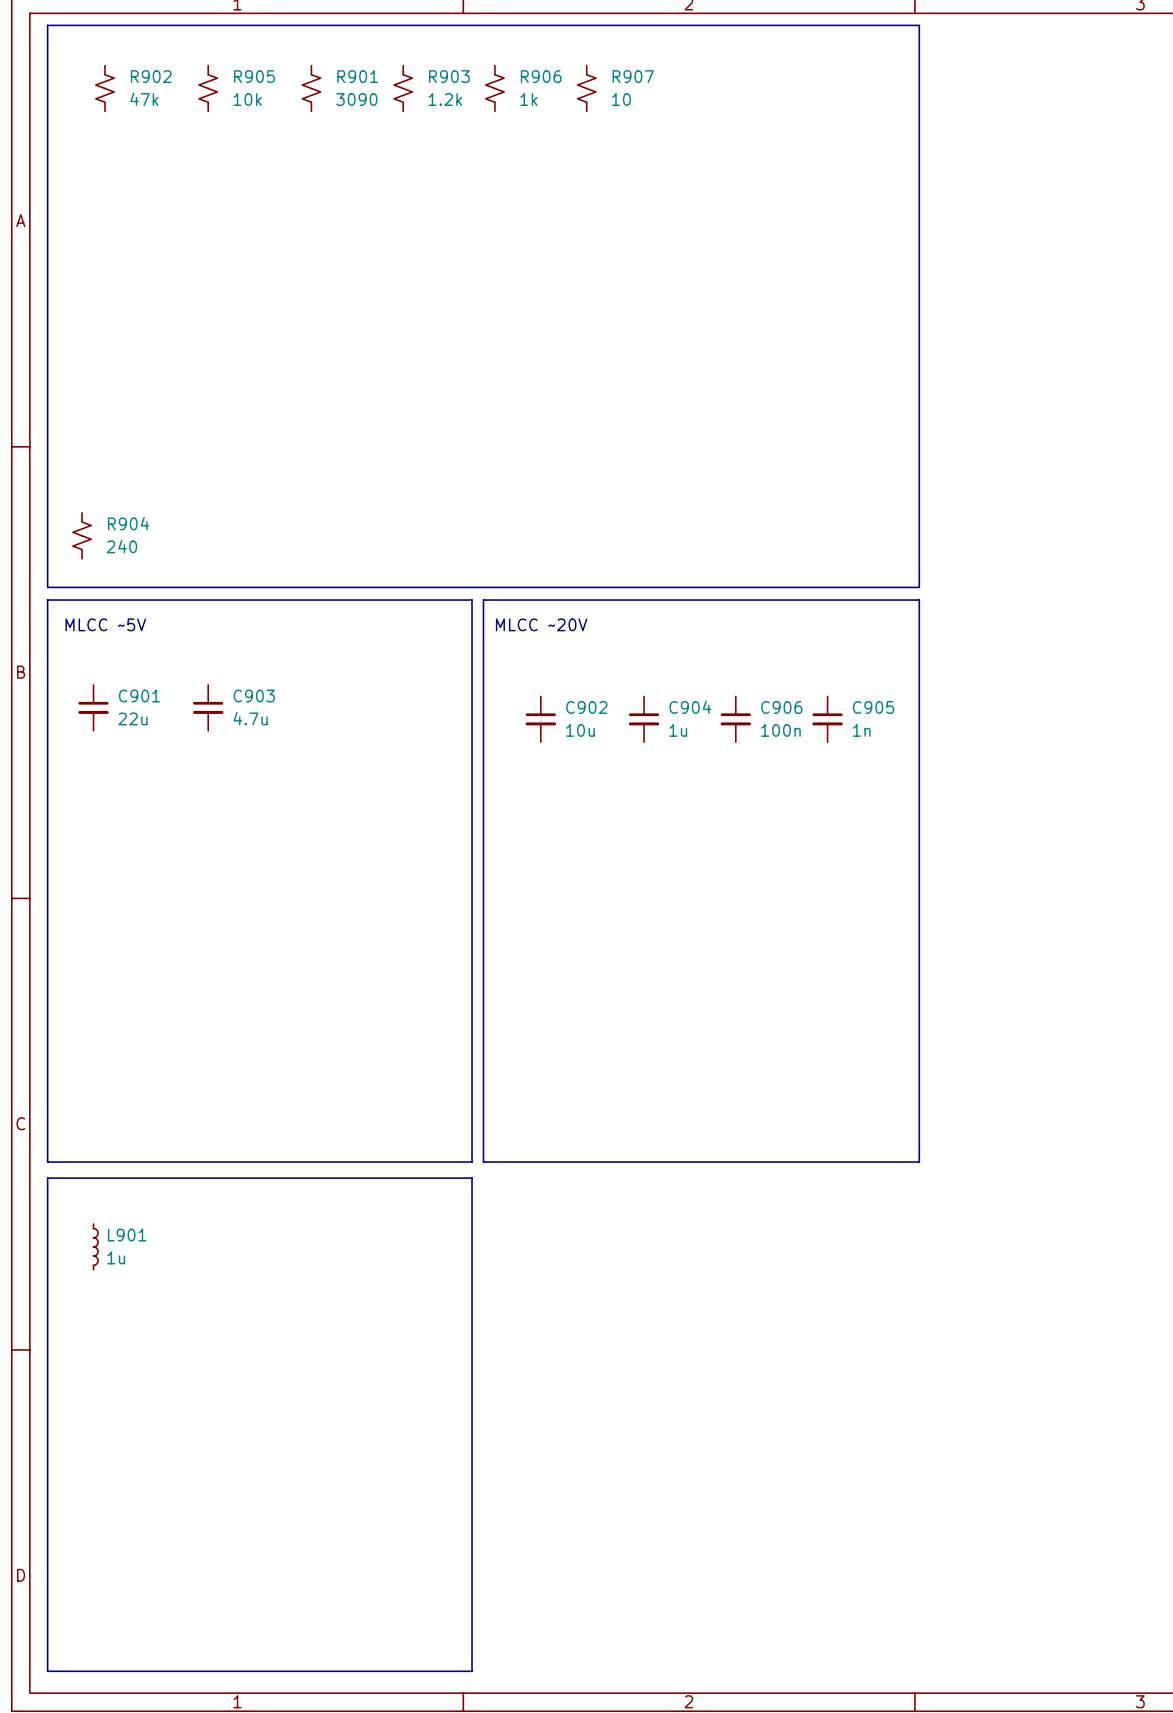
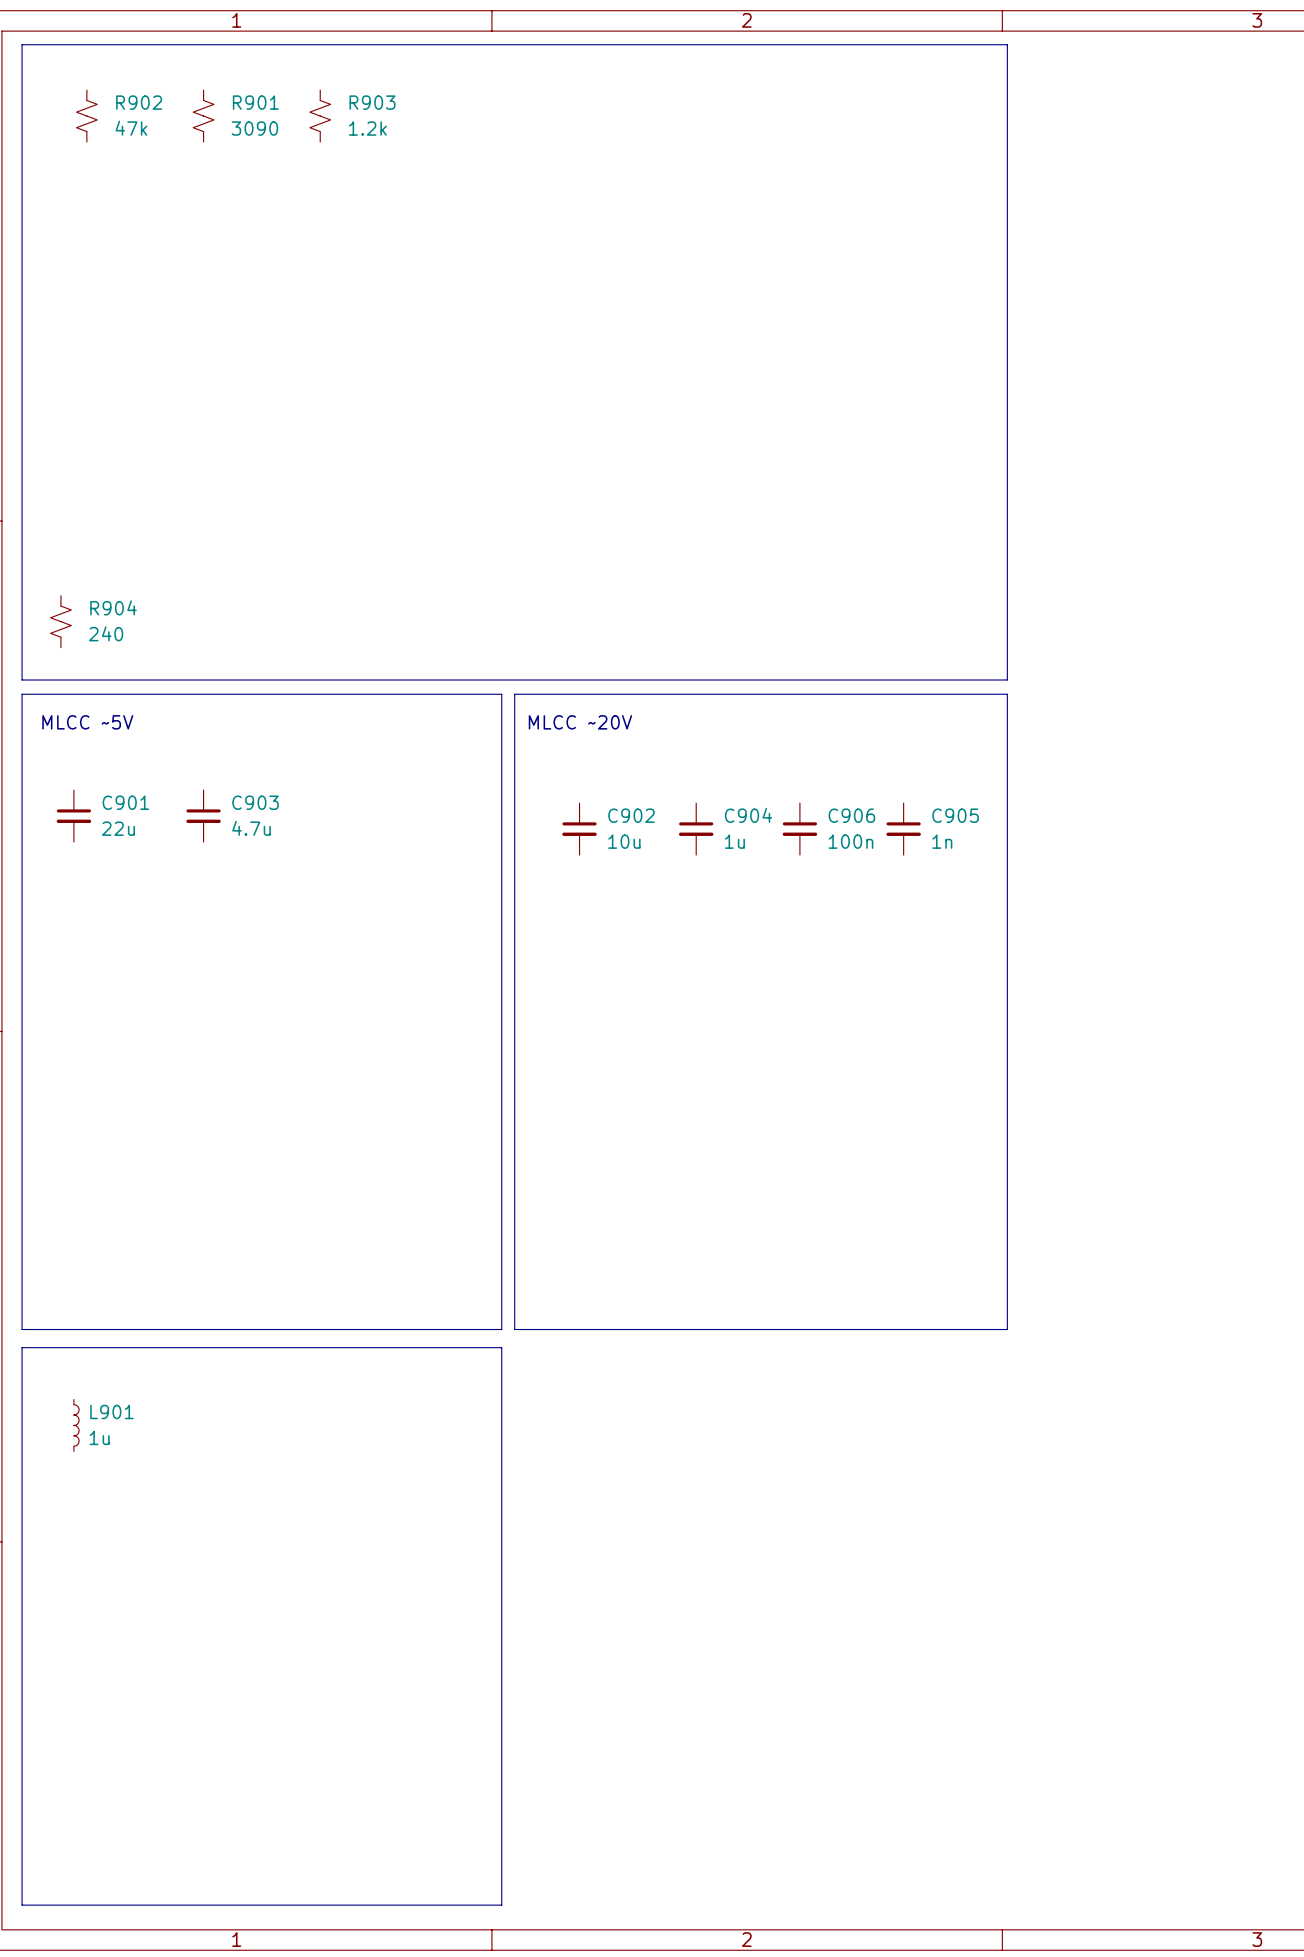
R905 name: R905 (254, 76) -> R901 (255, 102)
R901 name: R901 (357, 76) -> R903 (372, 102)
R903: 1.2k (403, 88) -> none
R906: 1k (494, 88) -> none
R907: 10 (586, 88) -> none
R905 value: 10k (247, 99) -> 3090 (254, 128)
R901 value: 3090 (356, 99) -> 1.2k (367, 128)

